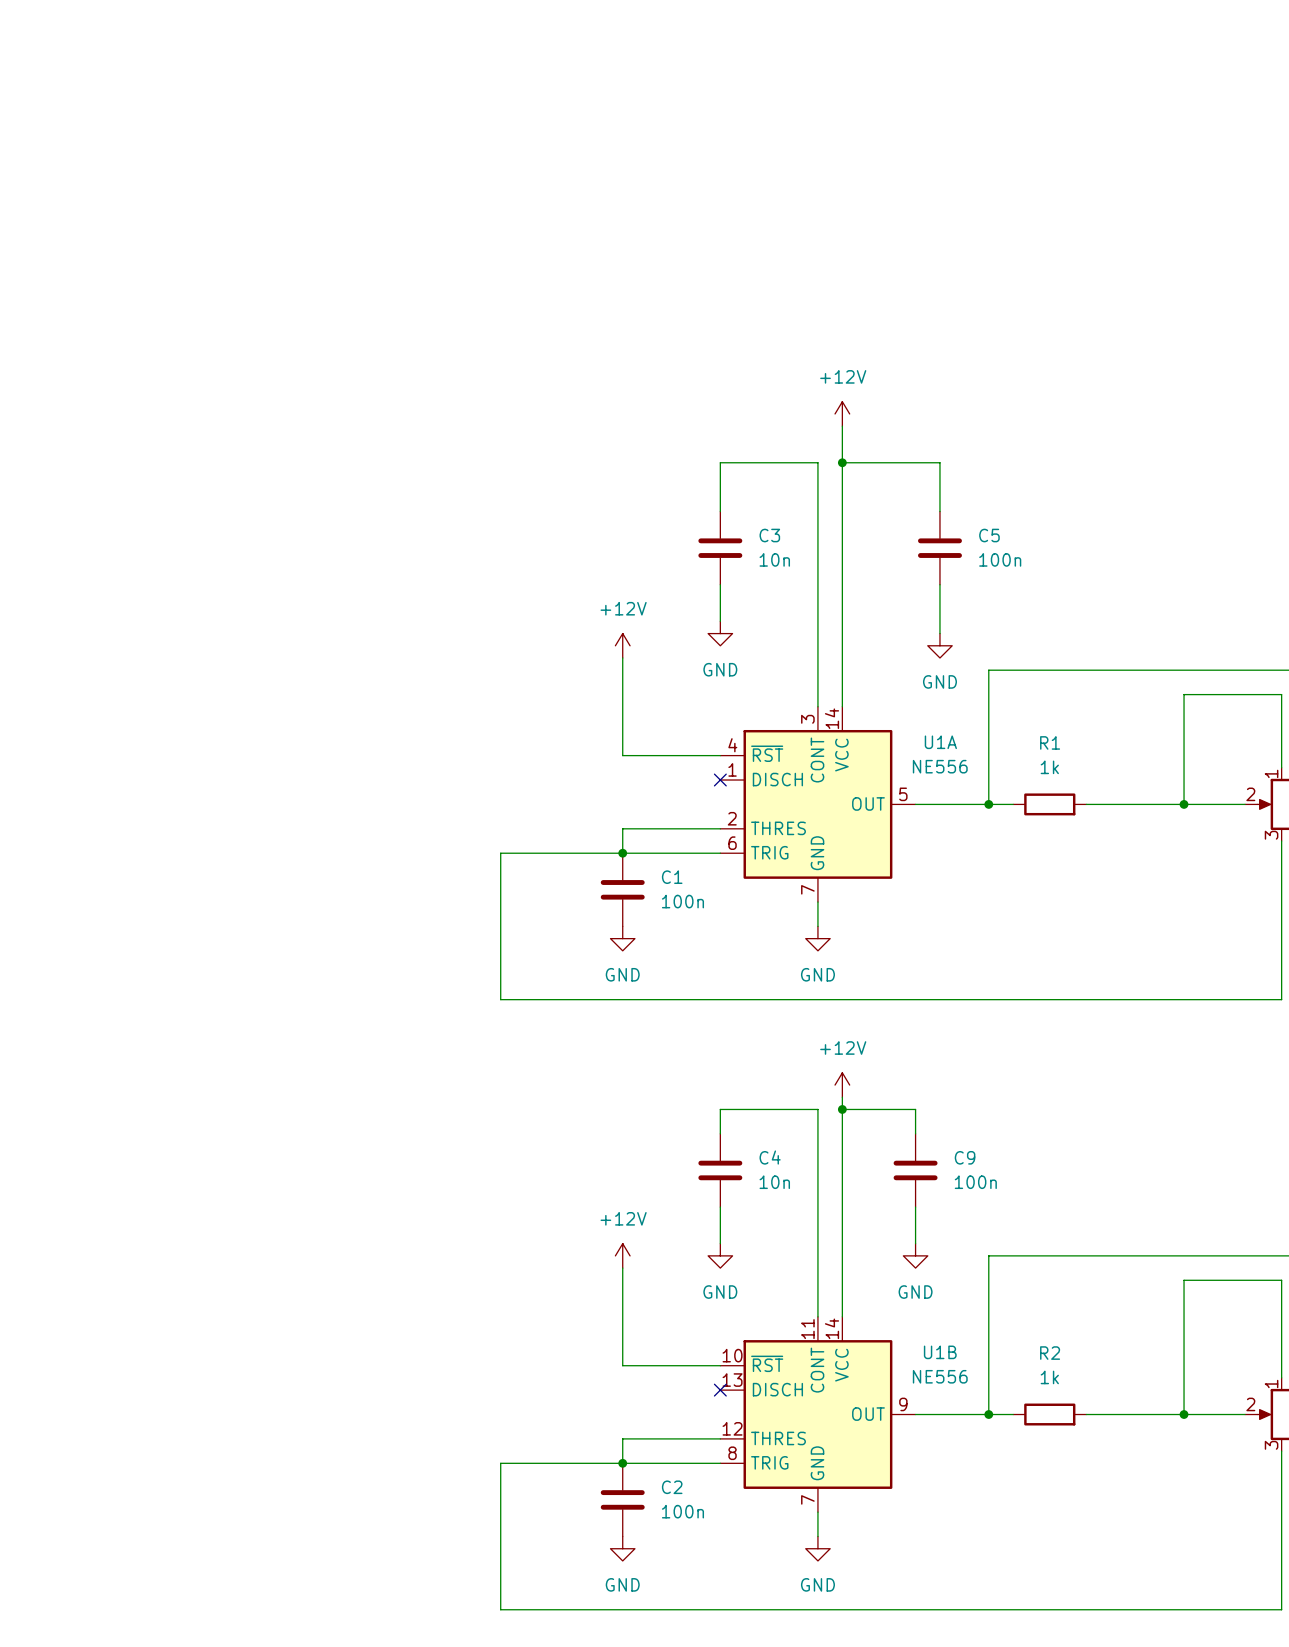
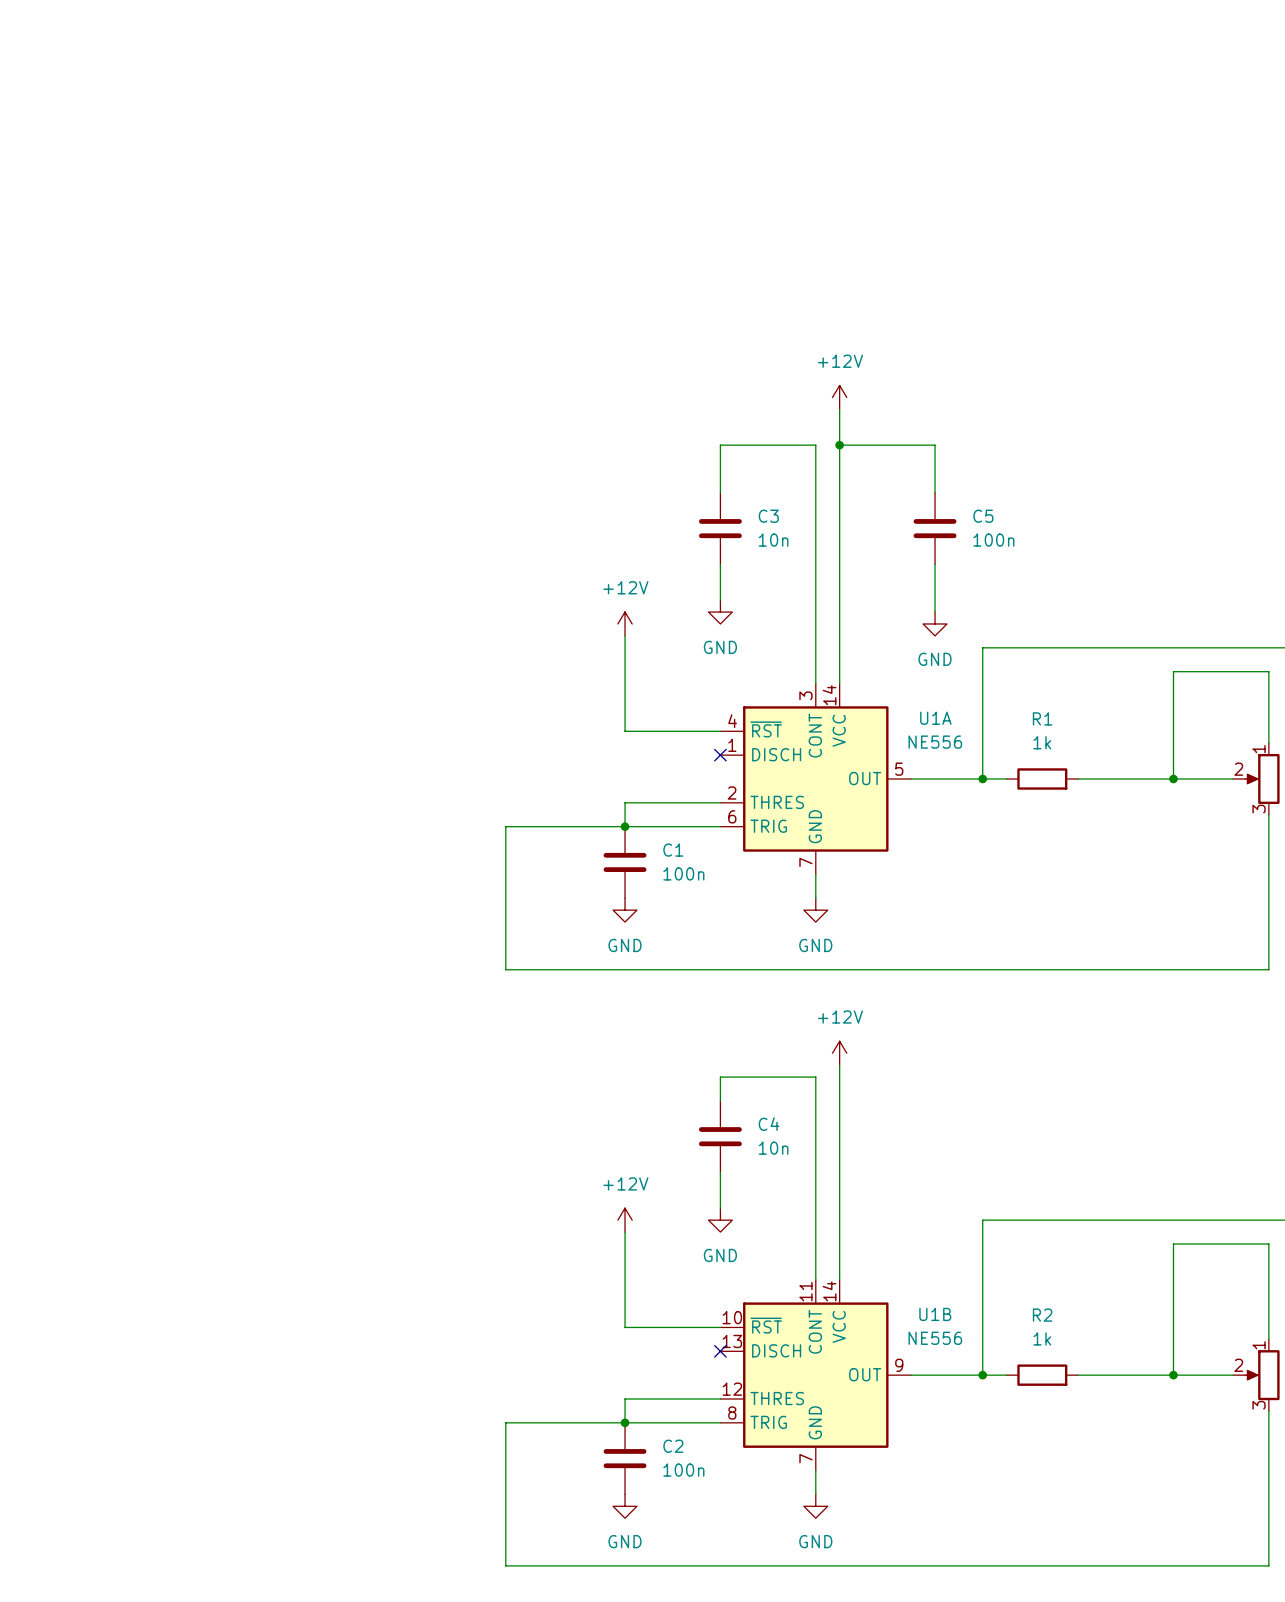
wire: (842, 1109) (915, 1109) (915, 1133) -> none
junction: (842, 1109) -> none
C9: 100n (915, 1170) -> none
wire: (915, 1207) (915, 1243) -> none
power symbol: GND (915, 1255) -> none

